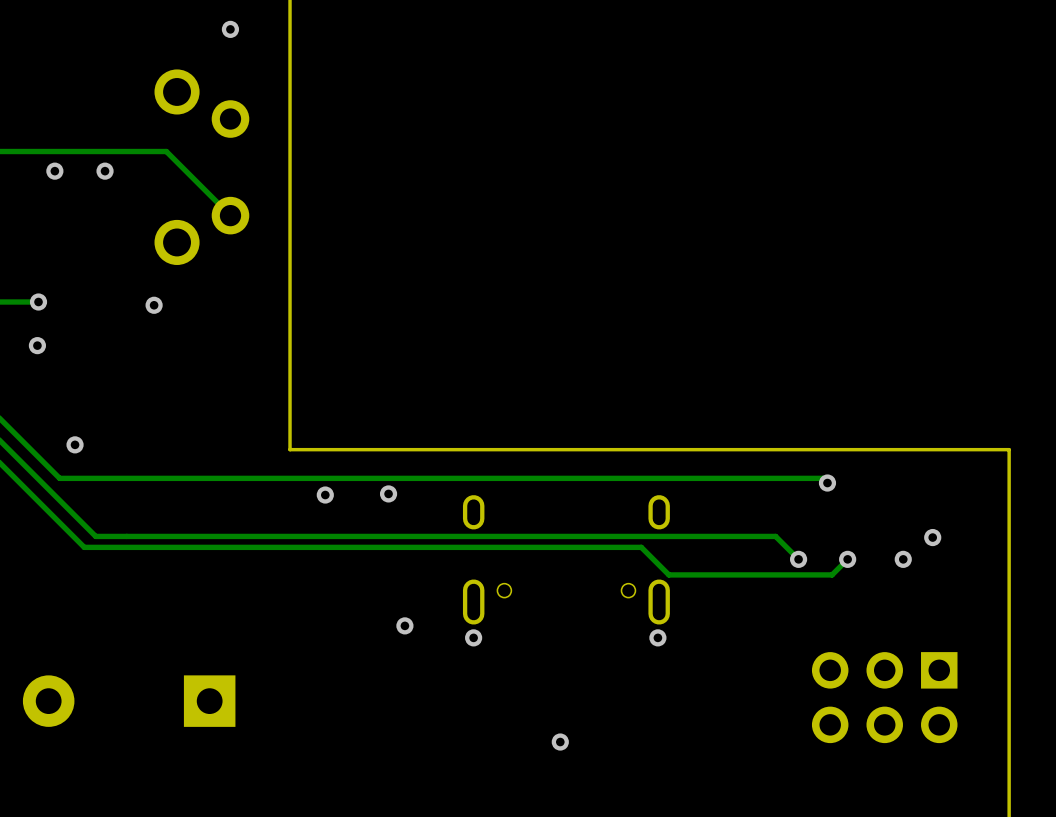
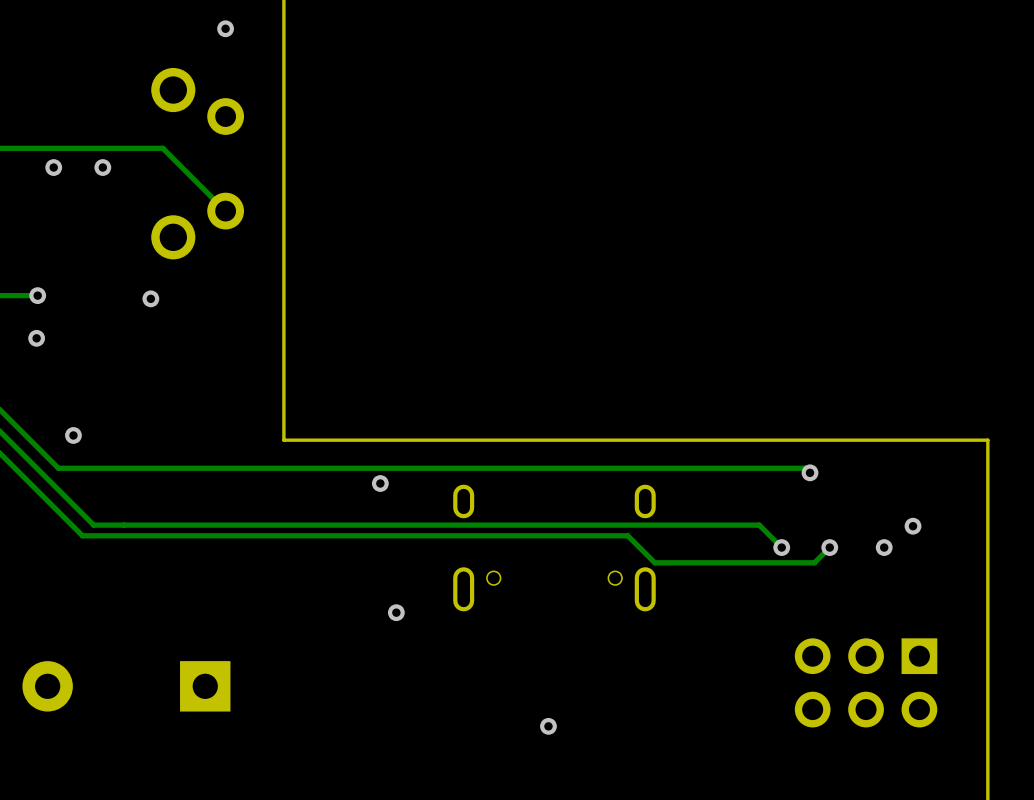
via: (325, 495) -> none
via: (473, 637) -> none
via: (657, 637) -> none

